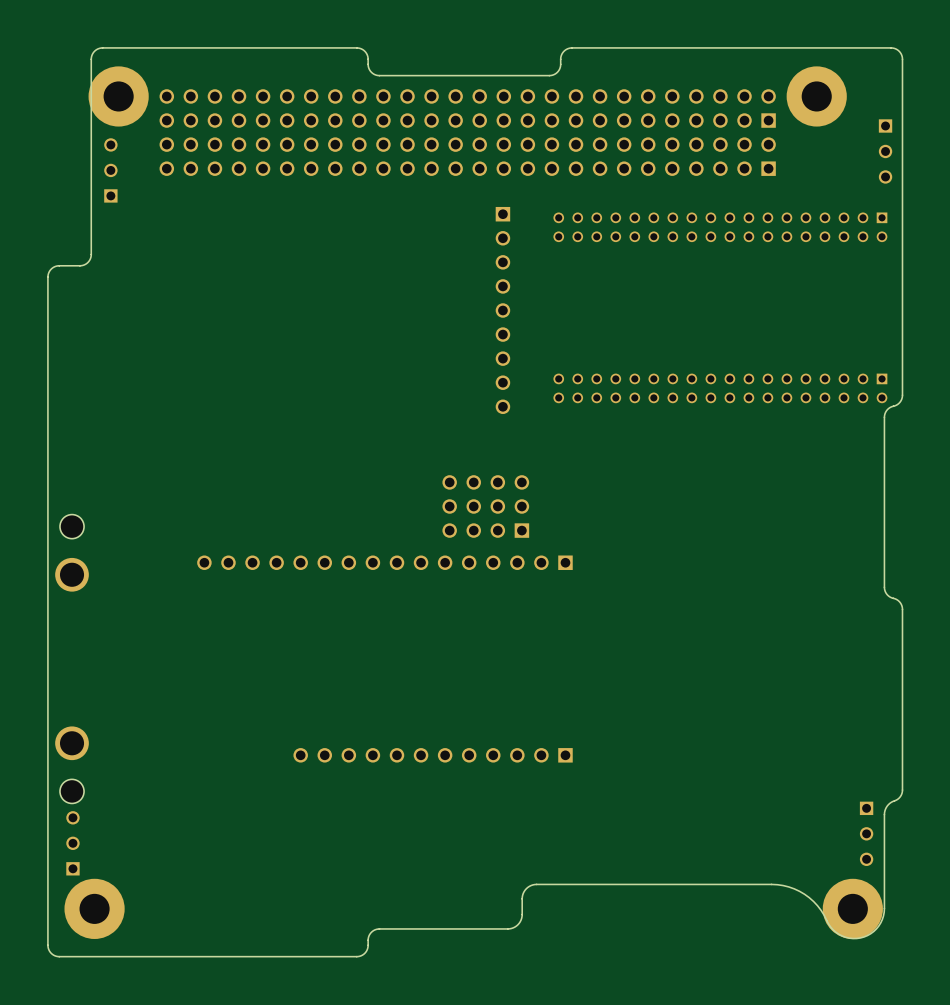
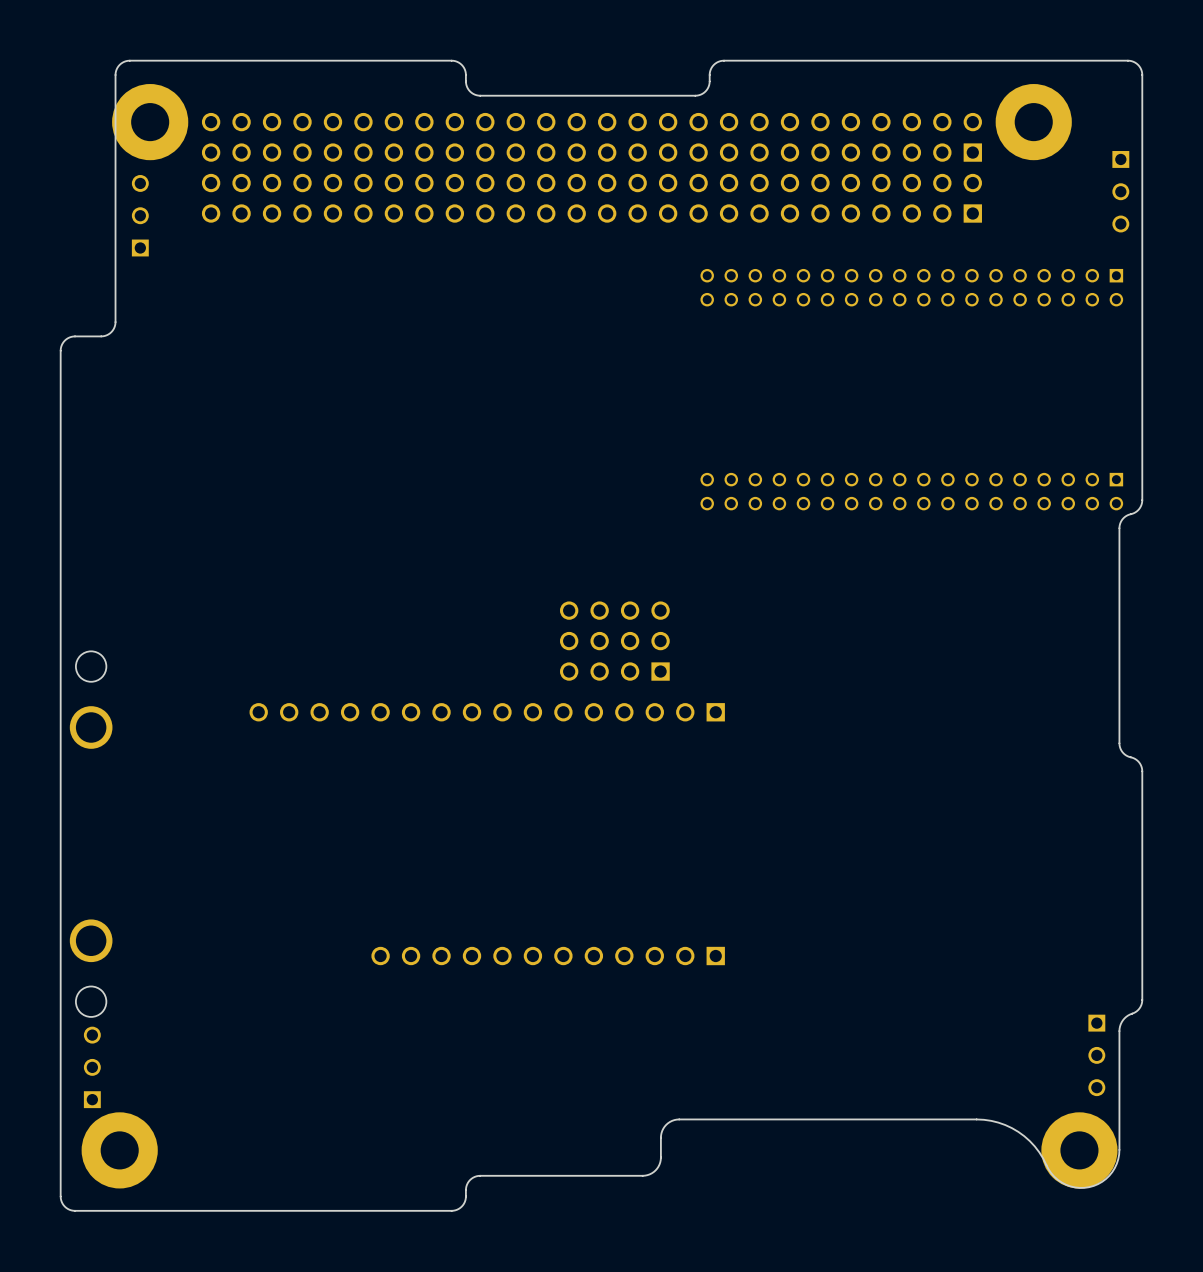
part: (502, 310) -> none

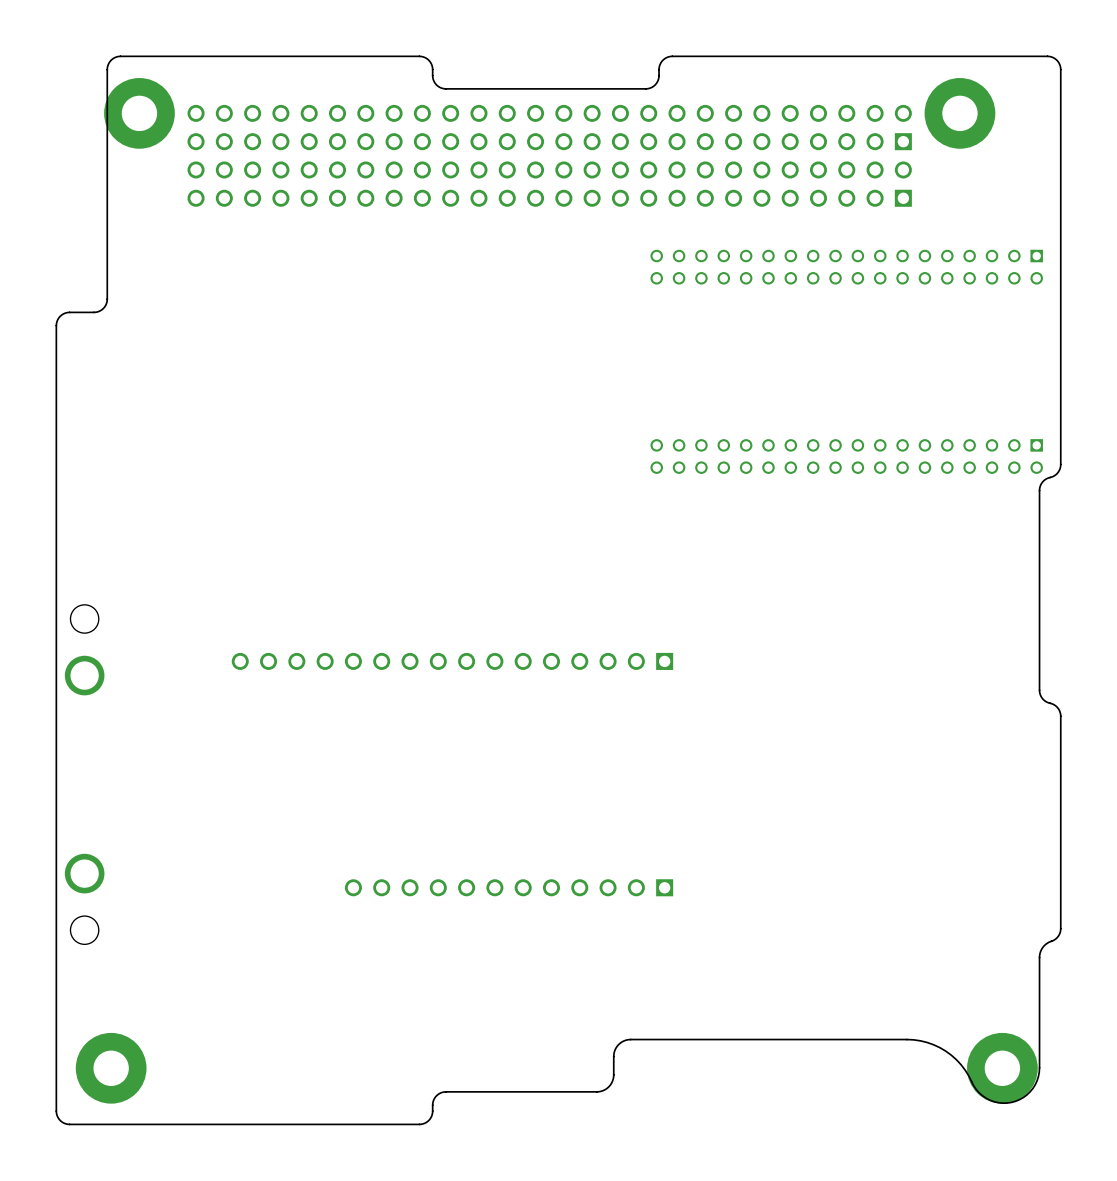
part: (1120, 191) -> none
part: (140, 215) -> none
part: (614, 641) -> none
part: (1096, 1055) -> none
part: (92, 1067) -> none

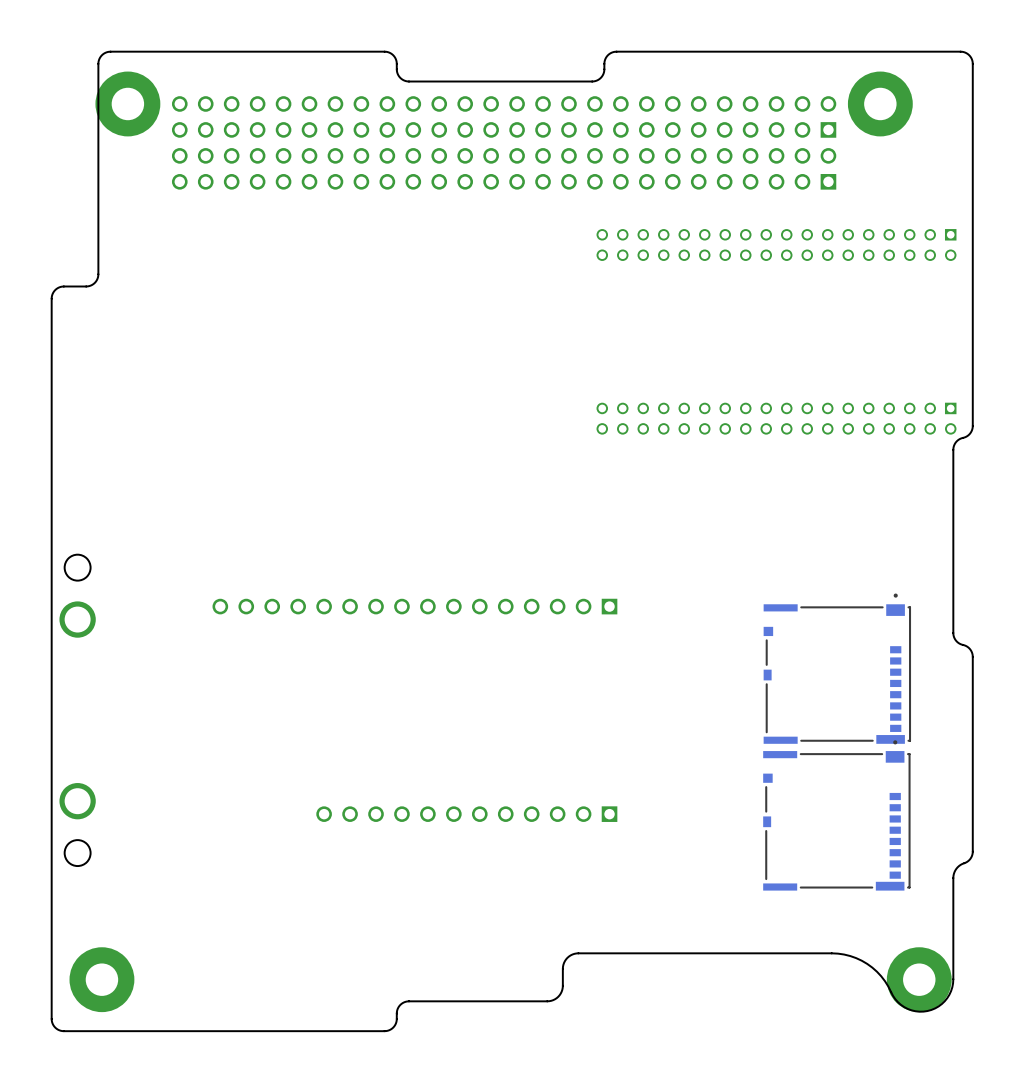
part: none -> (837, 668)
part: none -> (836, 815)

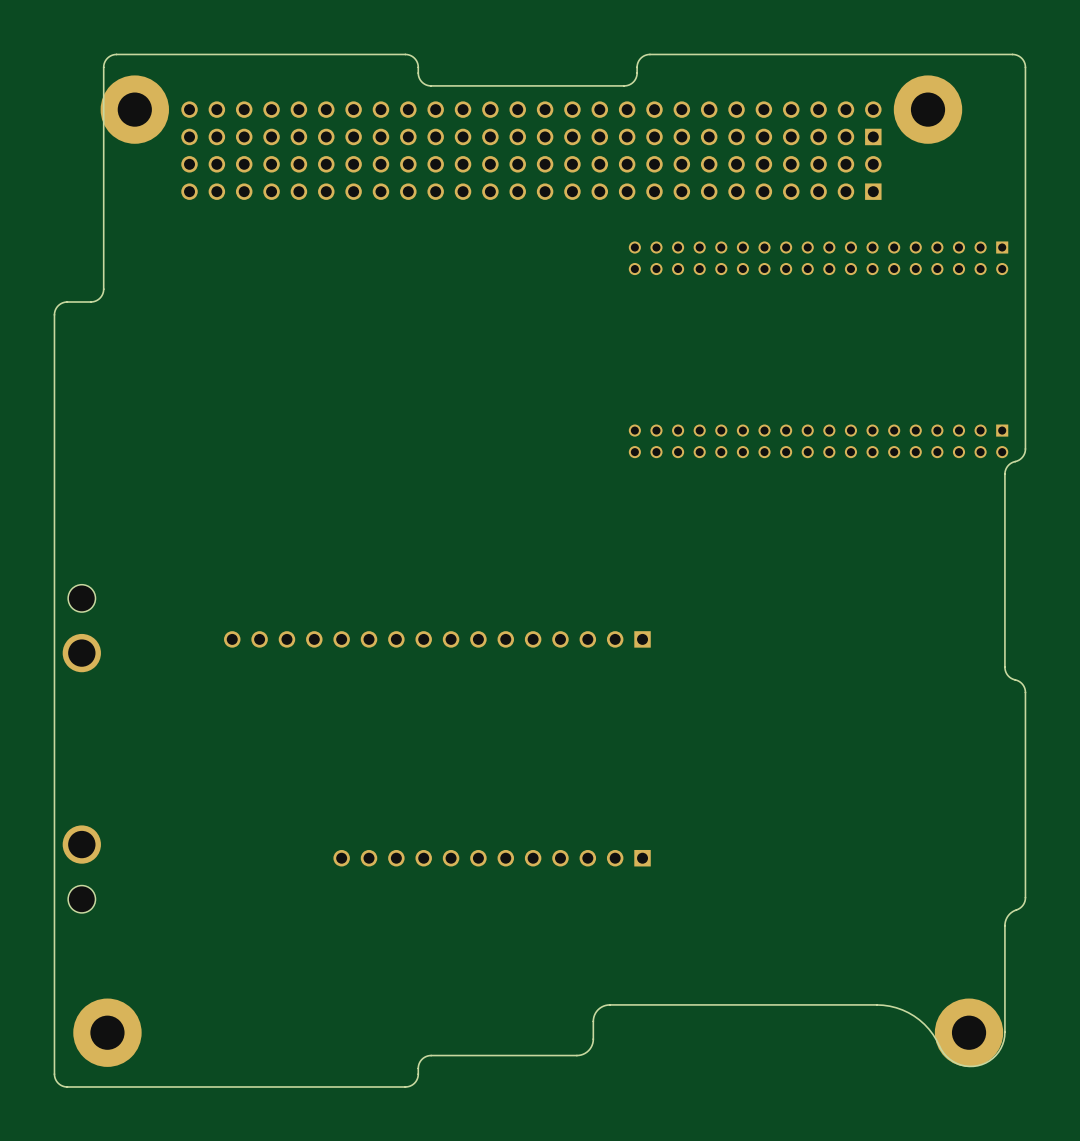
part: (837, 668) -> none
part: (836, 815) -> none

